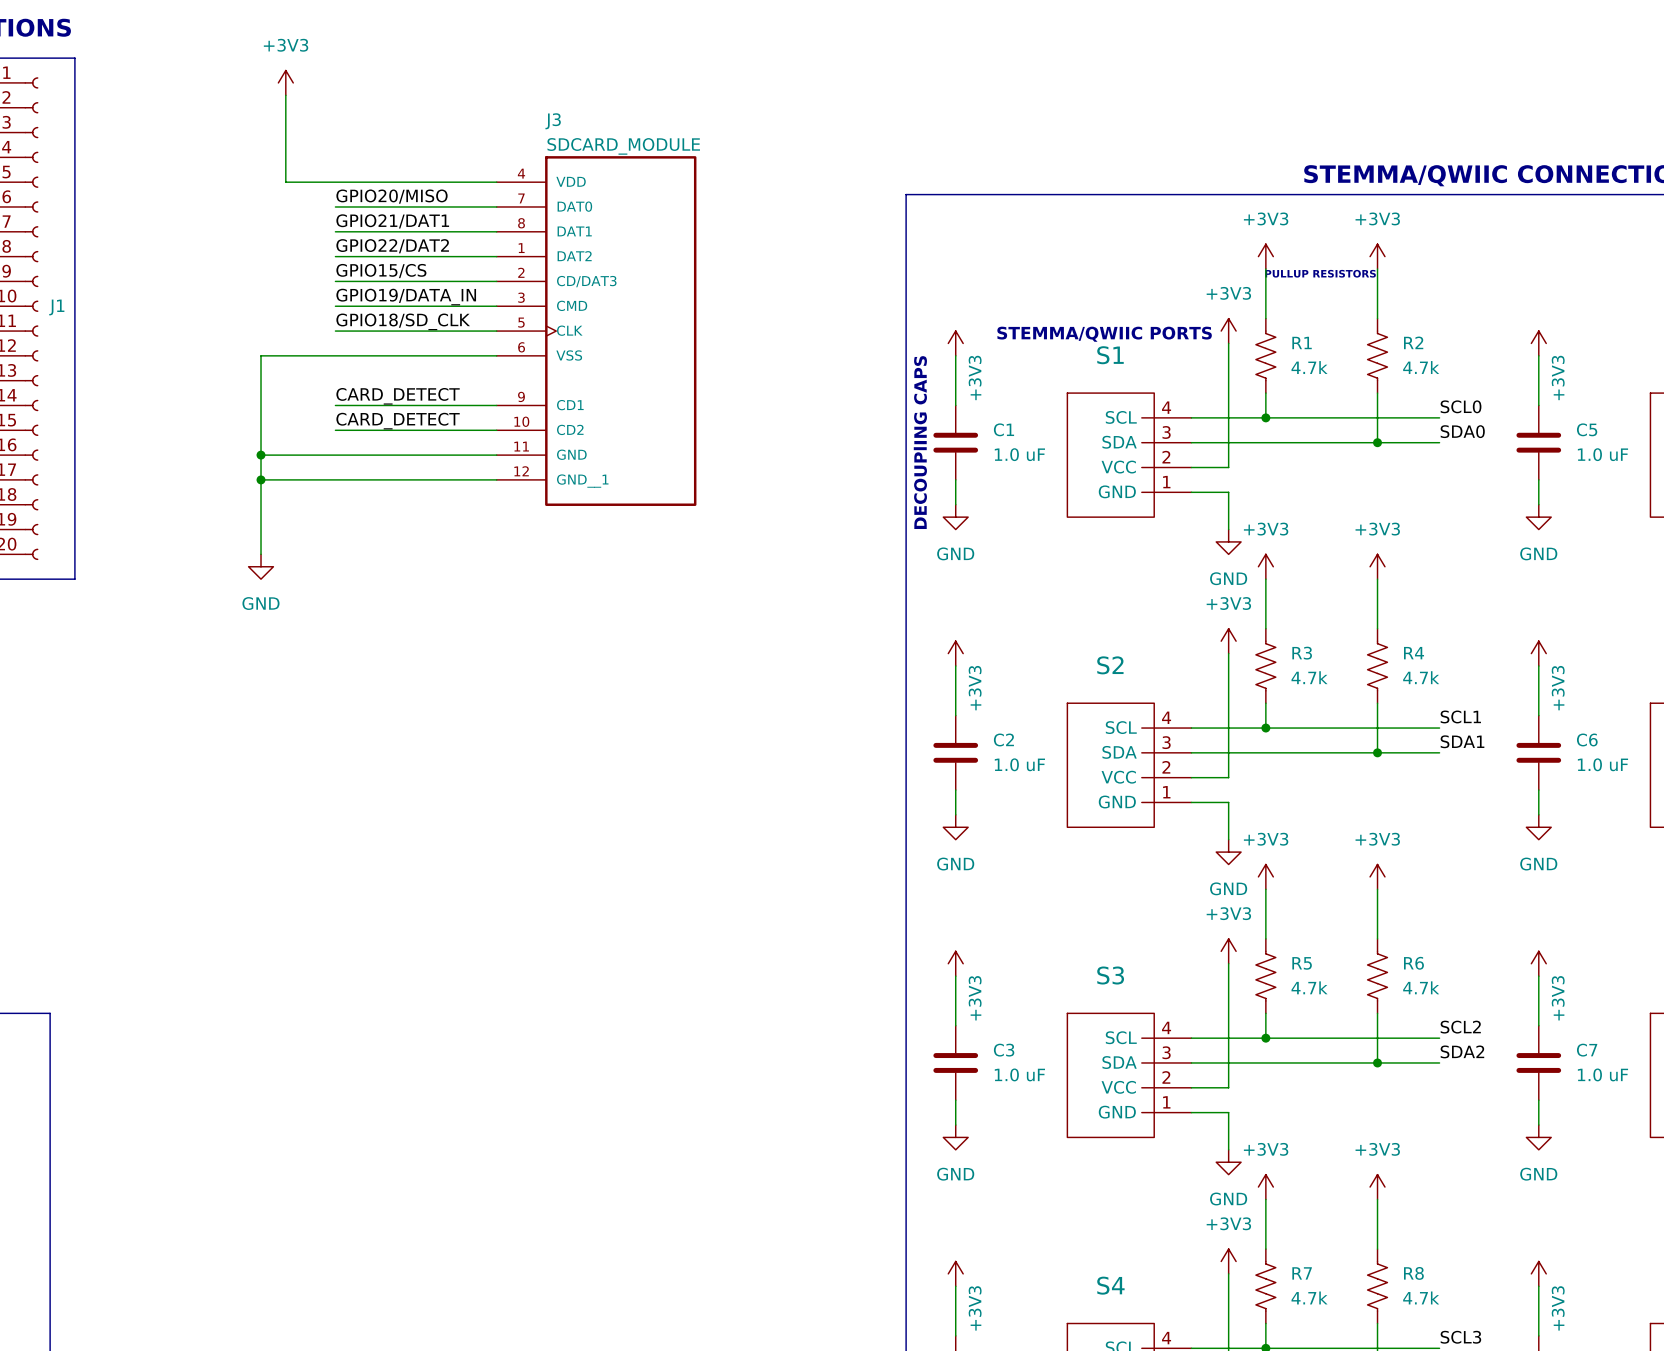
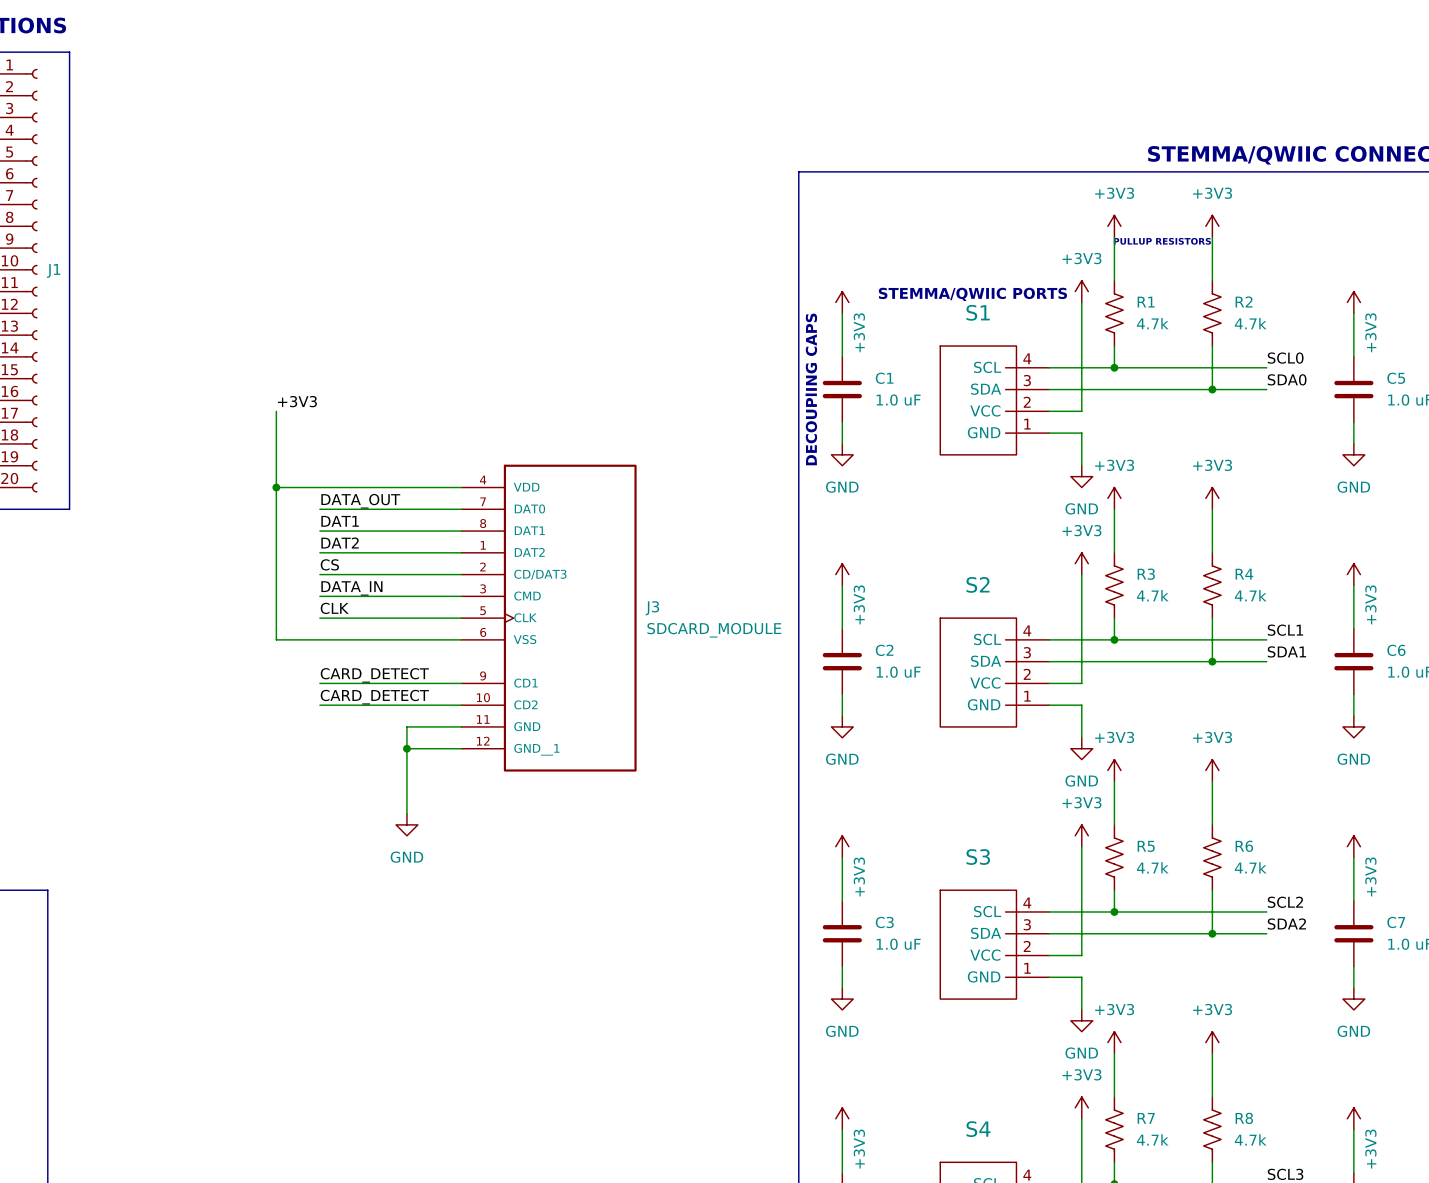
power symbol: +3V3 (285, 82) -> none
wire: (285, 95) (285, 182) (496, 182) -> none
J3 name position: J3 (553, 121) -> J3 (652, 608)
J3 value position: SDCARD_MODULE (623, 146) -> SDCARD_MODULE (714, 630)
label: GPIO20/MISO (392, 196) -> none
wire: (335, 206) (496, 206) -> none
label: GPIO21/DAT1 (392, 221) -> none
wire: (335, 231) (496, 231) -> none
label: GPIO22/DAT2 (392, 246) -> none
wire: (335, 256) (496, 256) -> none
label: GPIO15/CS (381, 271) -> none
wire: (335, 281) (496, 281) -> none
label: GPIO19/DATA_IN (406, 297) -> none
wire: (335, 306) (496, 306) -> none
label: GPIO18/SD_CLK (403, 321) -> none
wire: (335, 331) (496, 331) -> none
J3 position: (596, 331) -> (549, 618)
wire: (496, 355) (261, 355) (261, 554) -> none
label: CARD_DETECT (398, 396) -> none
wire: (335, 405) (496, 405) -> (319, 509) (461, 509)
label: CARD_DETECT (398, 421) -> none
wire: (335, 430) (496, 430) -> (319, 531) (461, 531)
wire: (261, 455) (496, 455) -> none
junction: (261, 455) -> none
label: none -> +3V3 (297, 401)
wire: none -> (276, 411) (276, 639) (461, 639)
wire: (261, 479) (496, 479) -> none
junction: (261, 479) -> none
wire: none -> (276, 487) (461, 487)
junction: none -> (276, 487)
power symbol: GND (261, 566) -> none
label: none -> DATA_OUT (360, 501)
label: none -> DAT1 (340, 521)
label: none -> DAT2 (340, 543)
wire: none -> (319, 552) (461, 552)
label: none -> CS (329, 564)
wire: none -> (319, 574) (461, 574)
label: none -> DATA_IN (351, 588)
wire: none -> (319, 596) (461, 596)
label: none -> CLK (334, 608)
wire: none -> (319, 618) (461, 618)
label: none -> CARD_DETECT (374, 675)
wire: none -> (319, 683) (461, 683)
label: none -> CARD_DETECT (374, 697)
wire: none -> (319, 705) (461, 705)
wire: none -> (461, 726) (406, 726) (406, 814)
wire: none -> (406, 748) (461, 748)
junction: none -> (406, 748)
power symbol: none -> GND (406, 824)

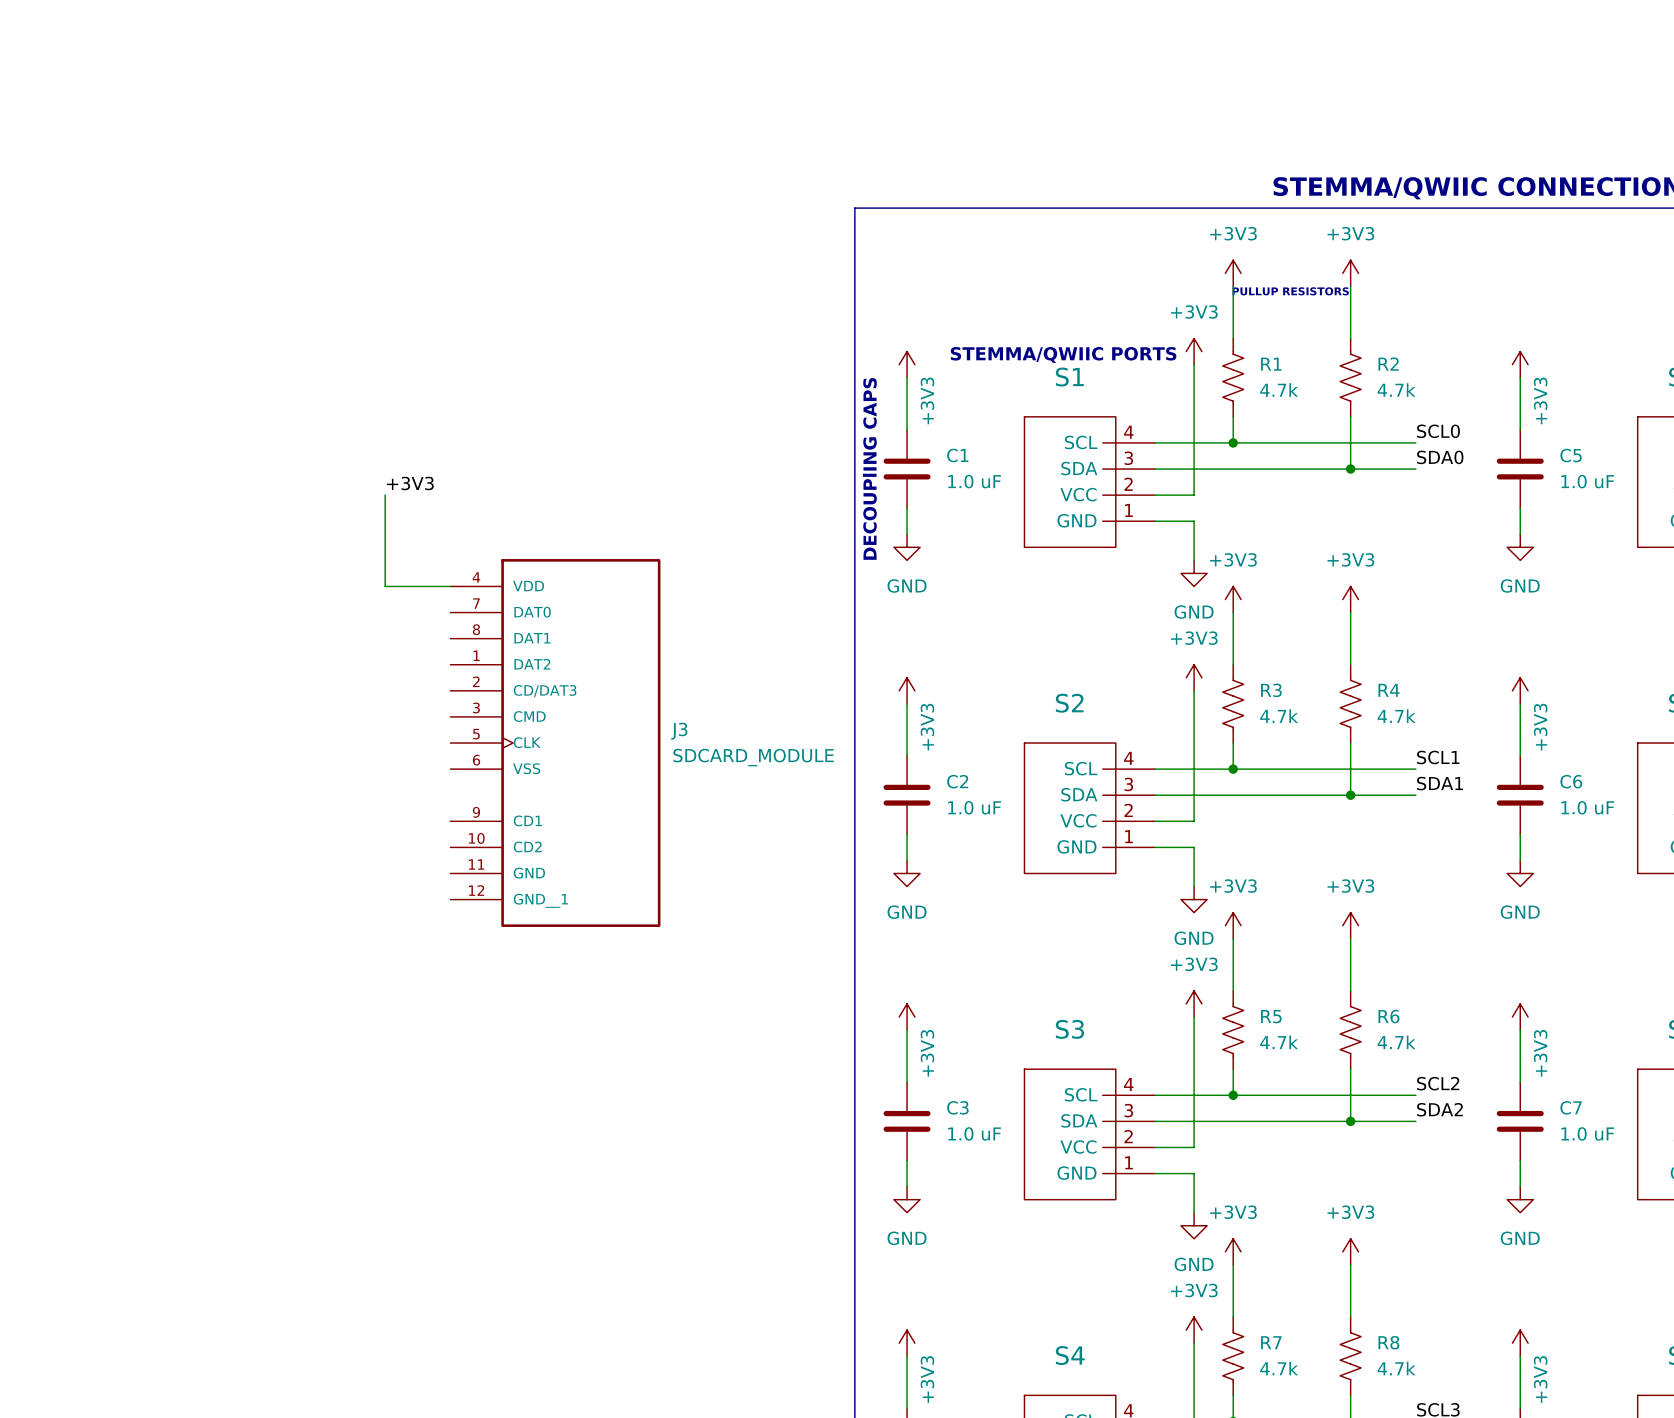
label position: +3V3 (297, 401) -> +3V3 (410, 483)
wire: (276, 411) (276, 639) (461, 639) -> none
wire: (276, 487) (406, 487) -> (385, 495) (385, 586)
junction: (276, 487) -> none
label: DATA_OUT (360, 501) -> none
wire: (319, 509) (461, 509) -> none
label: DAT1 (340, 521) -> none
wire: (319, 531) (461, 531) -> none
label: DAT2 (340, 543) -> none
wire: (319, 552) (461, 552) -> none
label: CS (329, 564) -> none
wire: (319, 574) (461, 574) -> none
label: DATA_IN (351, 588) -> none
wire: (319, 596) (461, 596) -> none
label: CLK (334, 608) -> none
wire: (319, 618) (461, 618) -> none
label: CARD_DETECT (374, 675) -> none
wire: (319, 683) (461, 683) -> none
label: CARD_DETECT (374, 697) -> none
wire: (319, 705) (461, 705) -> none
wire: (461, 726) (406, 726) (406, 814) -> none
wire: (406, 748) (461, 748) -> none
junction: (406, 748) -> none
power symbol: GND (406, 824) -> none

